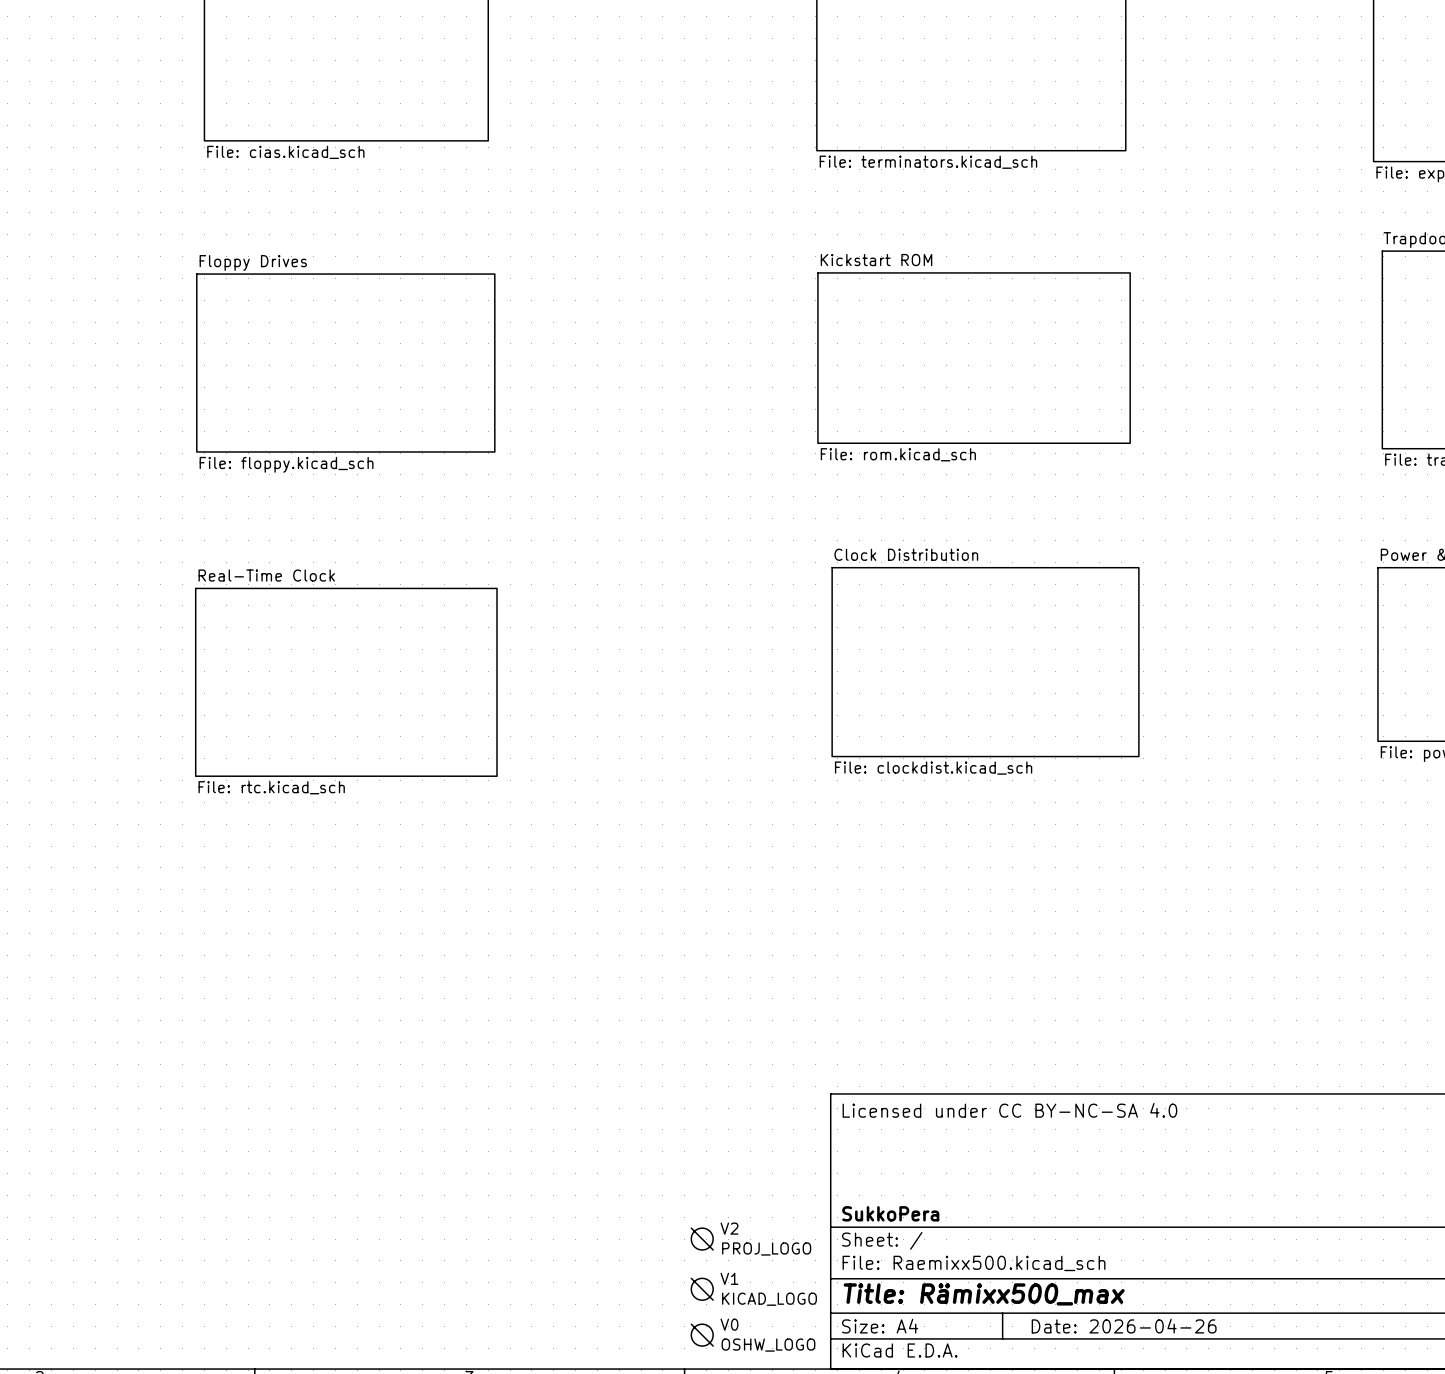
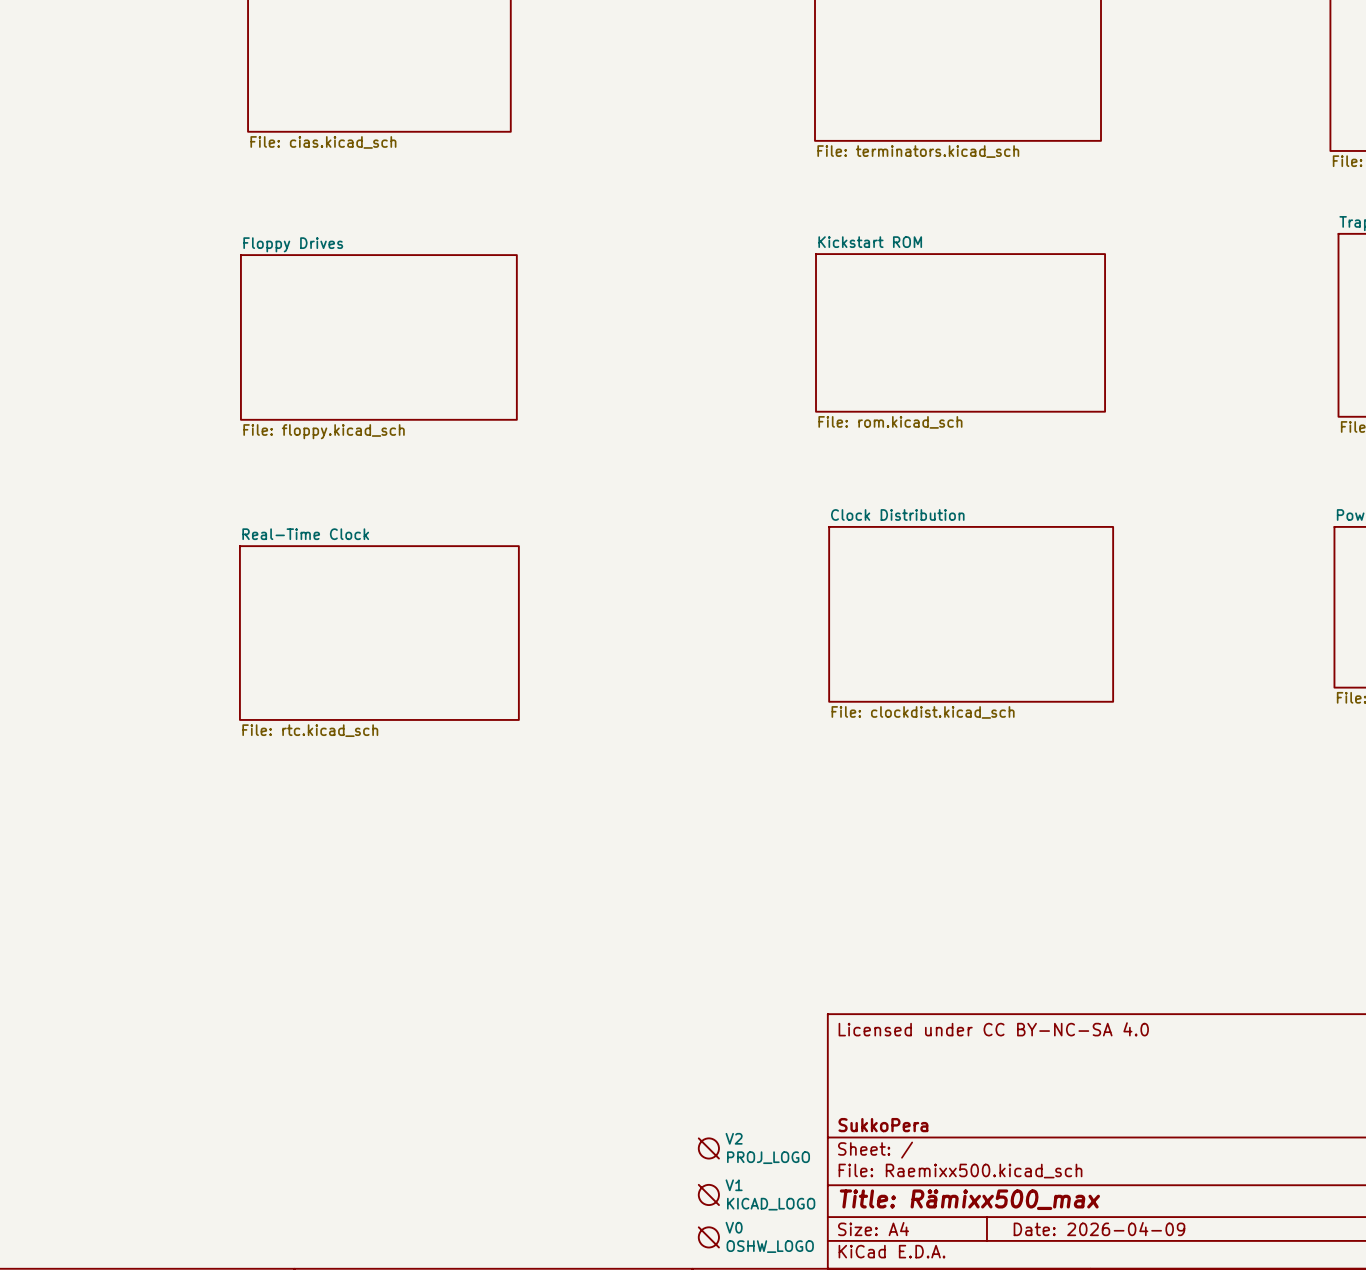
title block: Date: 2026-04-26 (1124, 1326) -> Date: 2026-04-09 (1099, 1229)

